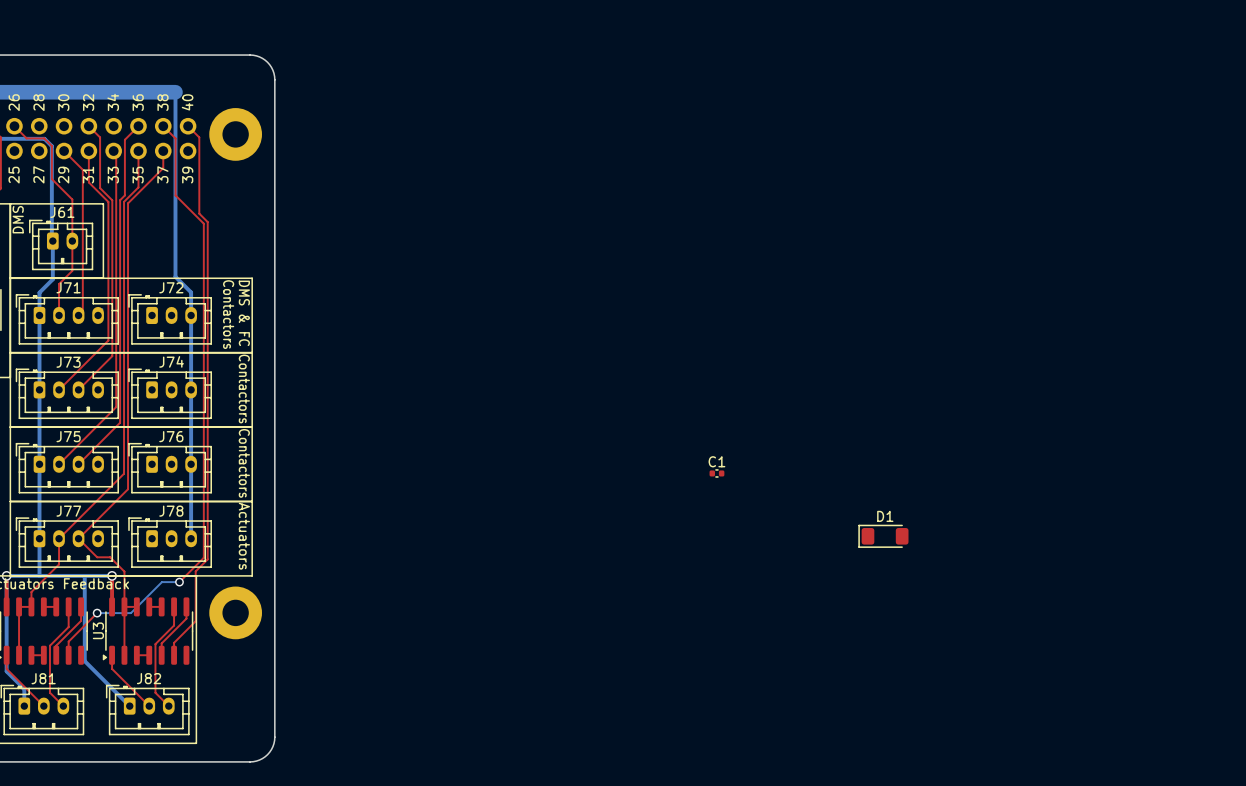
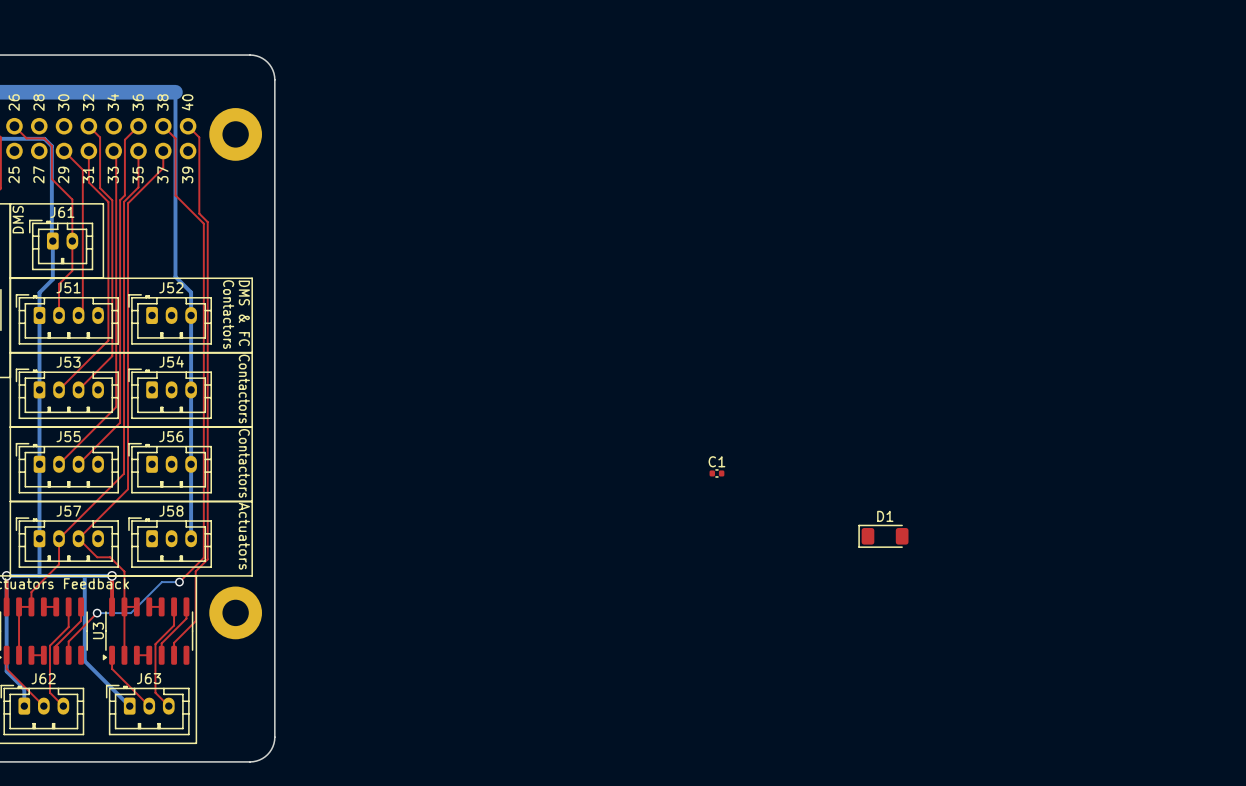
J71 name: J71 (68, 287) -> J51 (68, 287)
J72 name: J72 (171, 287) -> J52 (171, 287)
J74 name: J74 (171, 361) -> J54 (171, 361)
J73 name: J73 (68, 362) -> J53 (68, 362)
J75 name: J75 (68, 436) -> J55 (68, 436)
J76 name: J76 (171, 436) -> J56 (171, 436)
J77 name: J77 (68, 511) -> J57 (68, 511)
J78 name: J78 (171, 511) -> J58 (171, 511)
J81 name: J81 (43, 678) -> J62 (43, 678)
J82 name: J82 (149, 678) -> J63 (149, 678)

